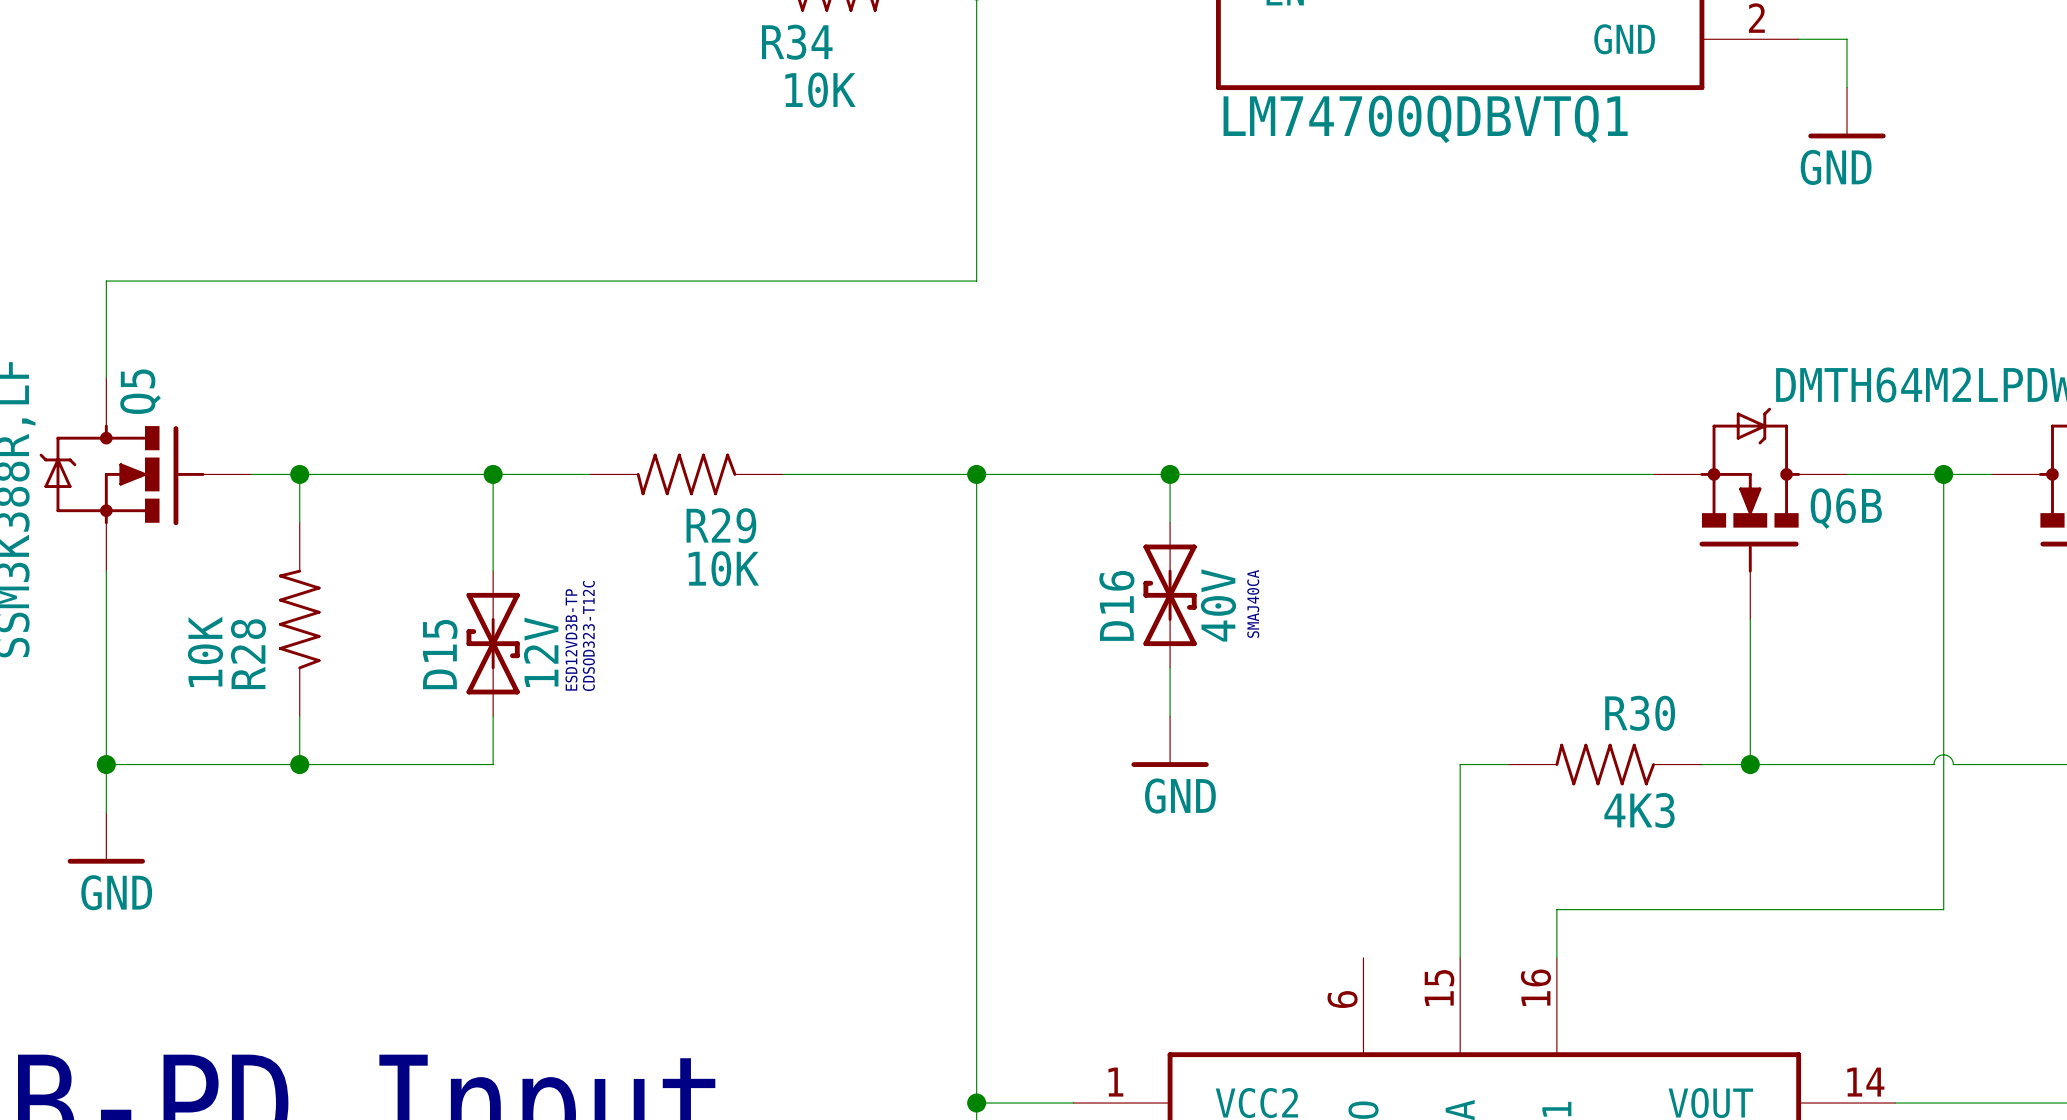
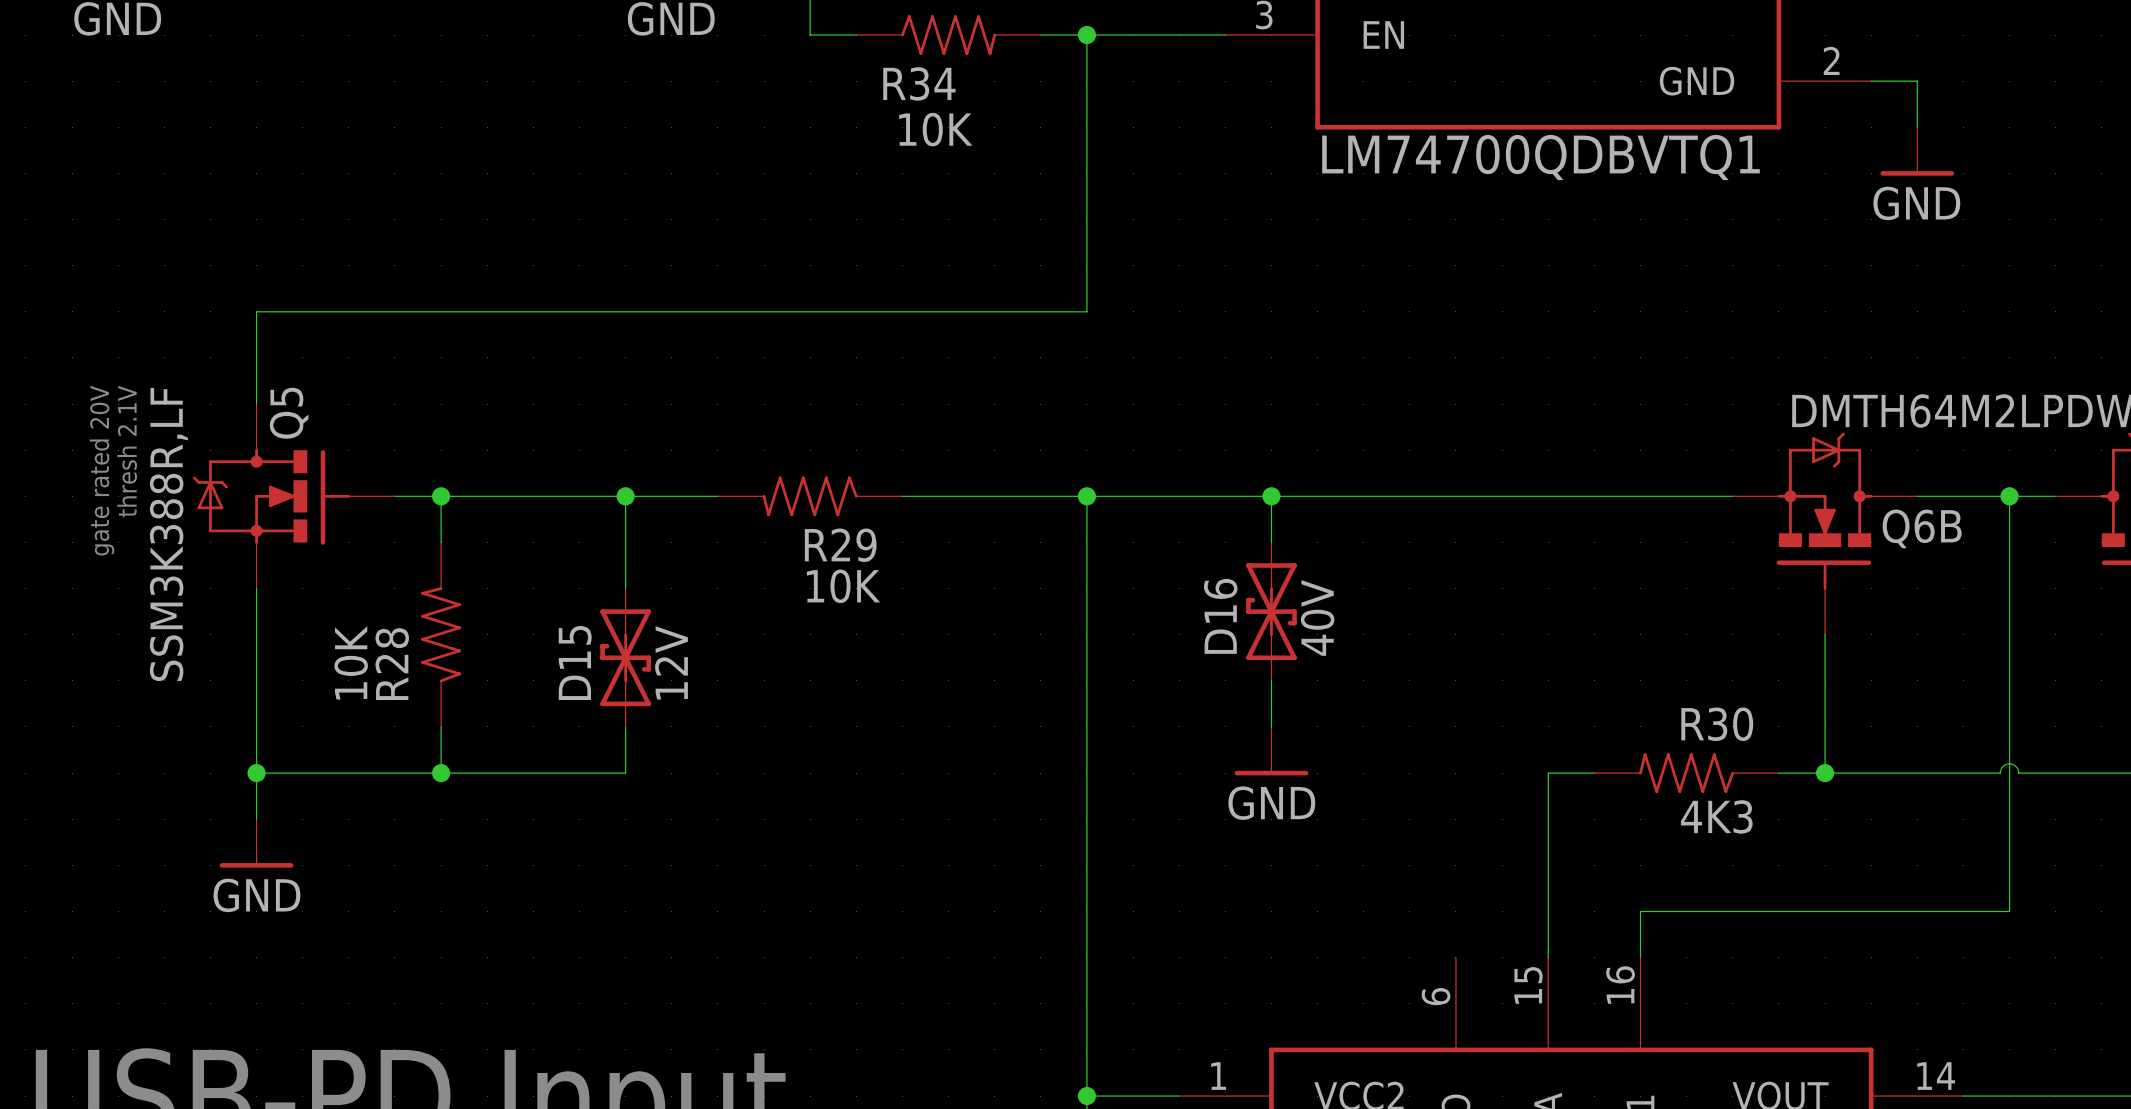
text: SMAJ40CA (1253, 603) -> none
text: CDSOD323-T12C (588, 636) -> none
text: ESD12VD3B-TP (571, 639) -> none

